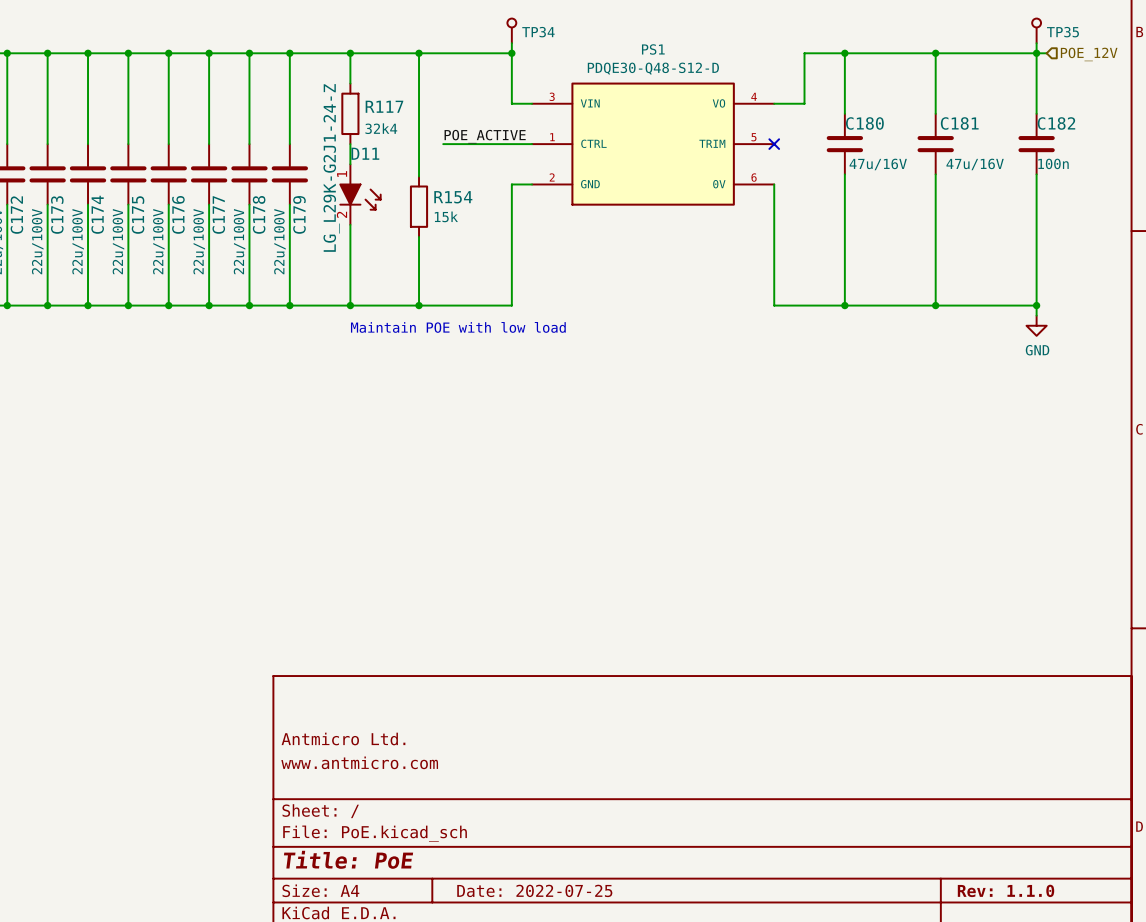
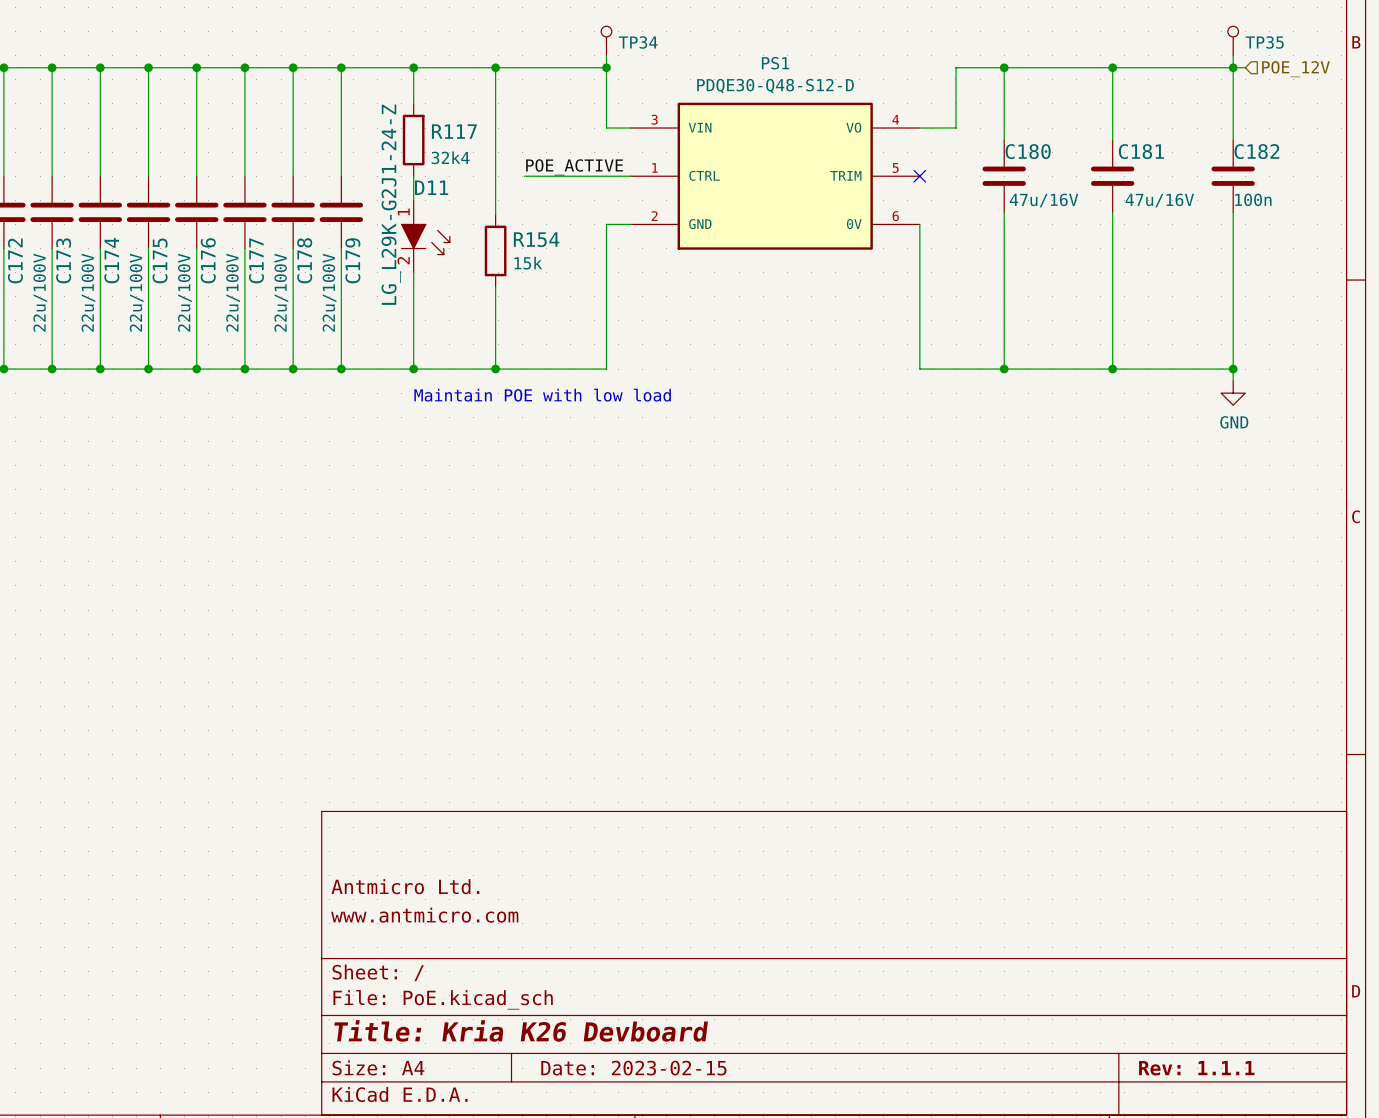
title block: Title: PoE (348, 859) -> Title: Kria K26 Devboard (521, 1030)
title block: Date: 2022-07-25 (534, 890) -> Date: 2023-02-15 (633, 1068)
title block: Rev: 1.1.0 (1006, 890) -> Rev: 1.1.1 (1196, 1068)

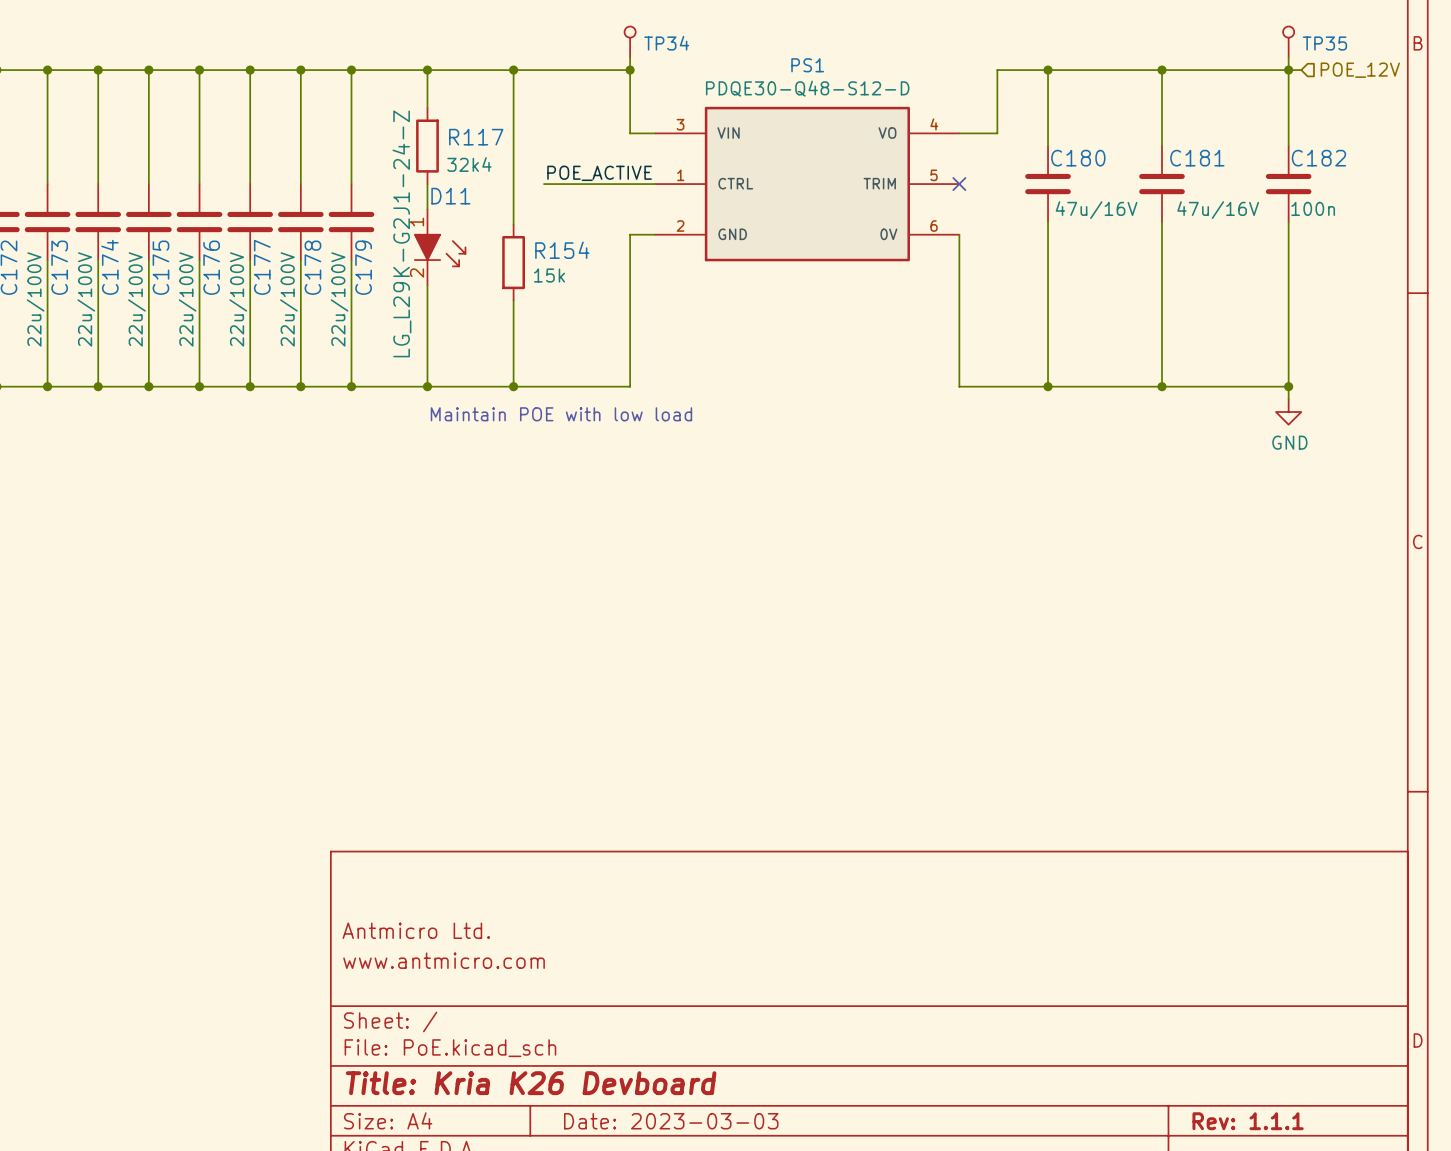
title block: Date: 2023-02-15 (633, 1068) -> Date: 2023-03-03 (671, 1121)

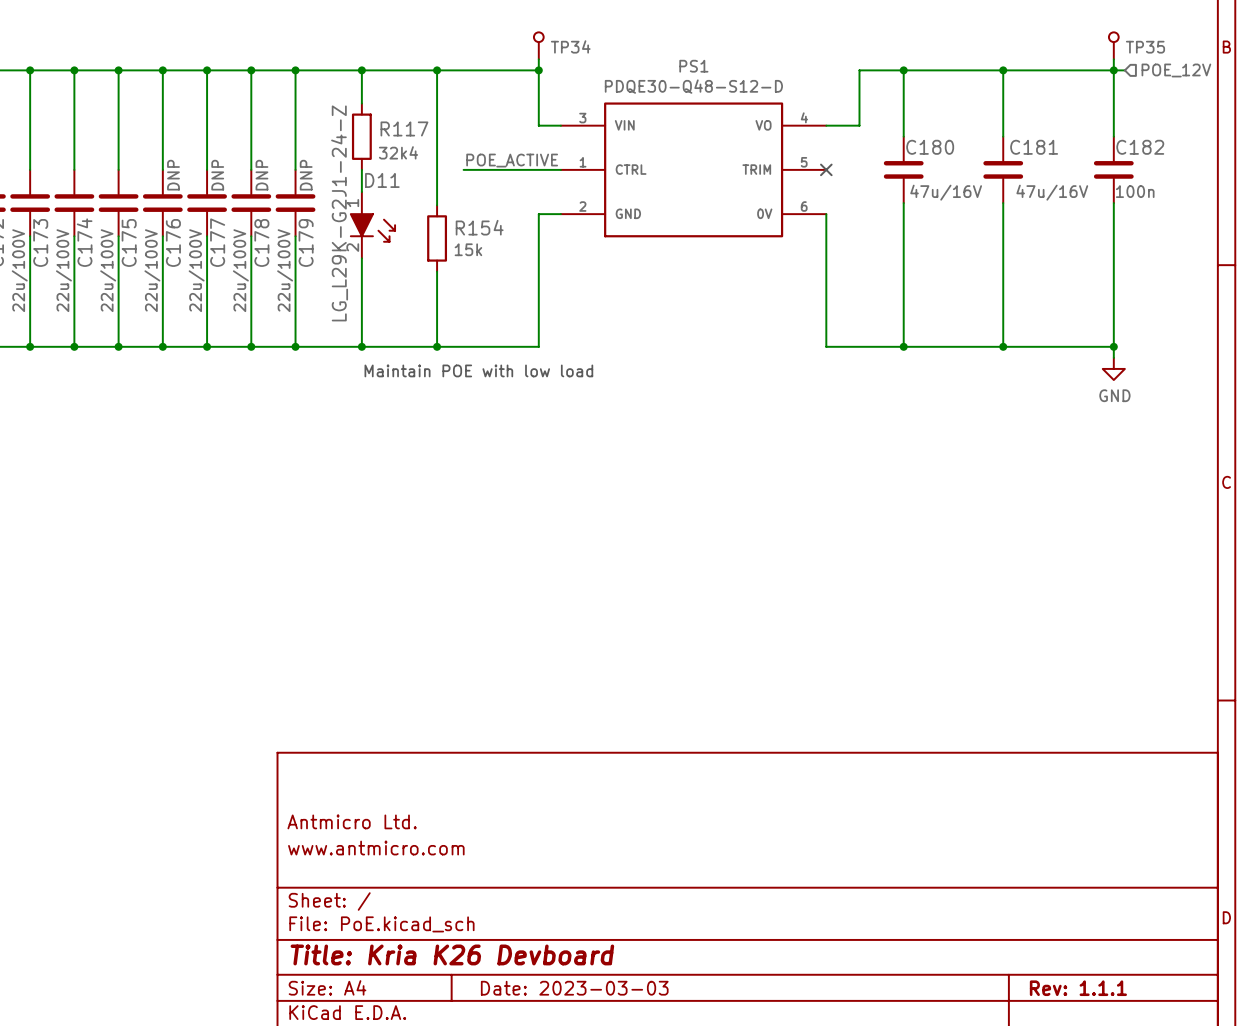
C176 text: none -> DNP (173, 175)
C177 text: none -> DNP (217, 175)
C178 text: none -> DNP (261, 175)
C179 text: none -> DNP (306, 175)

